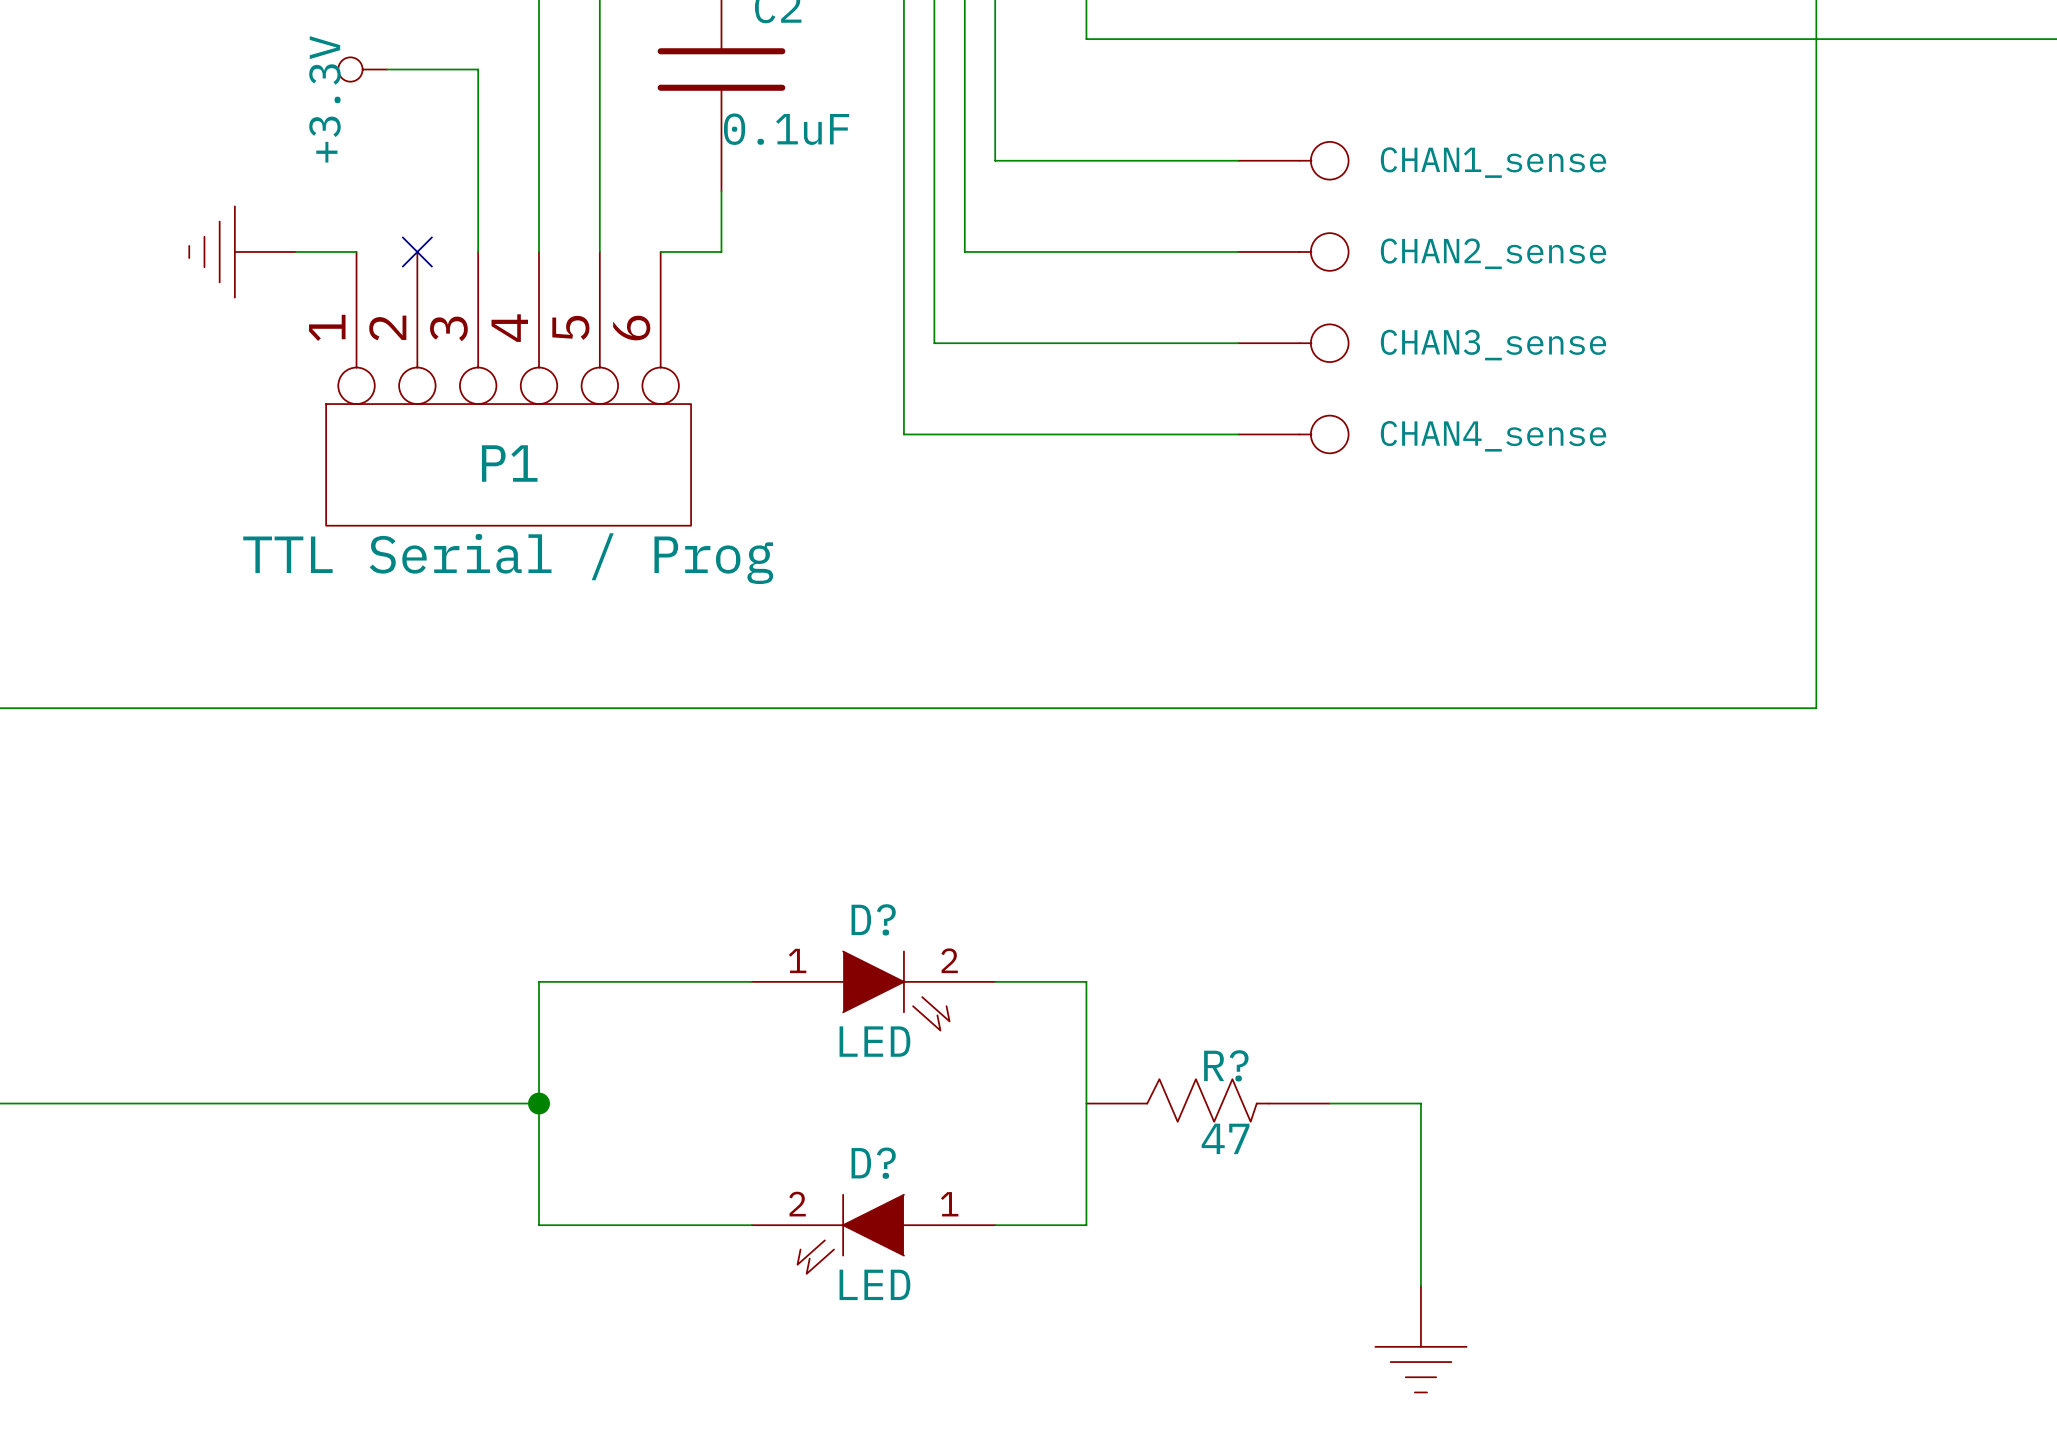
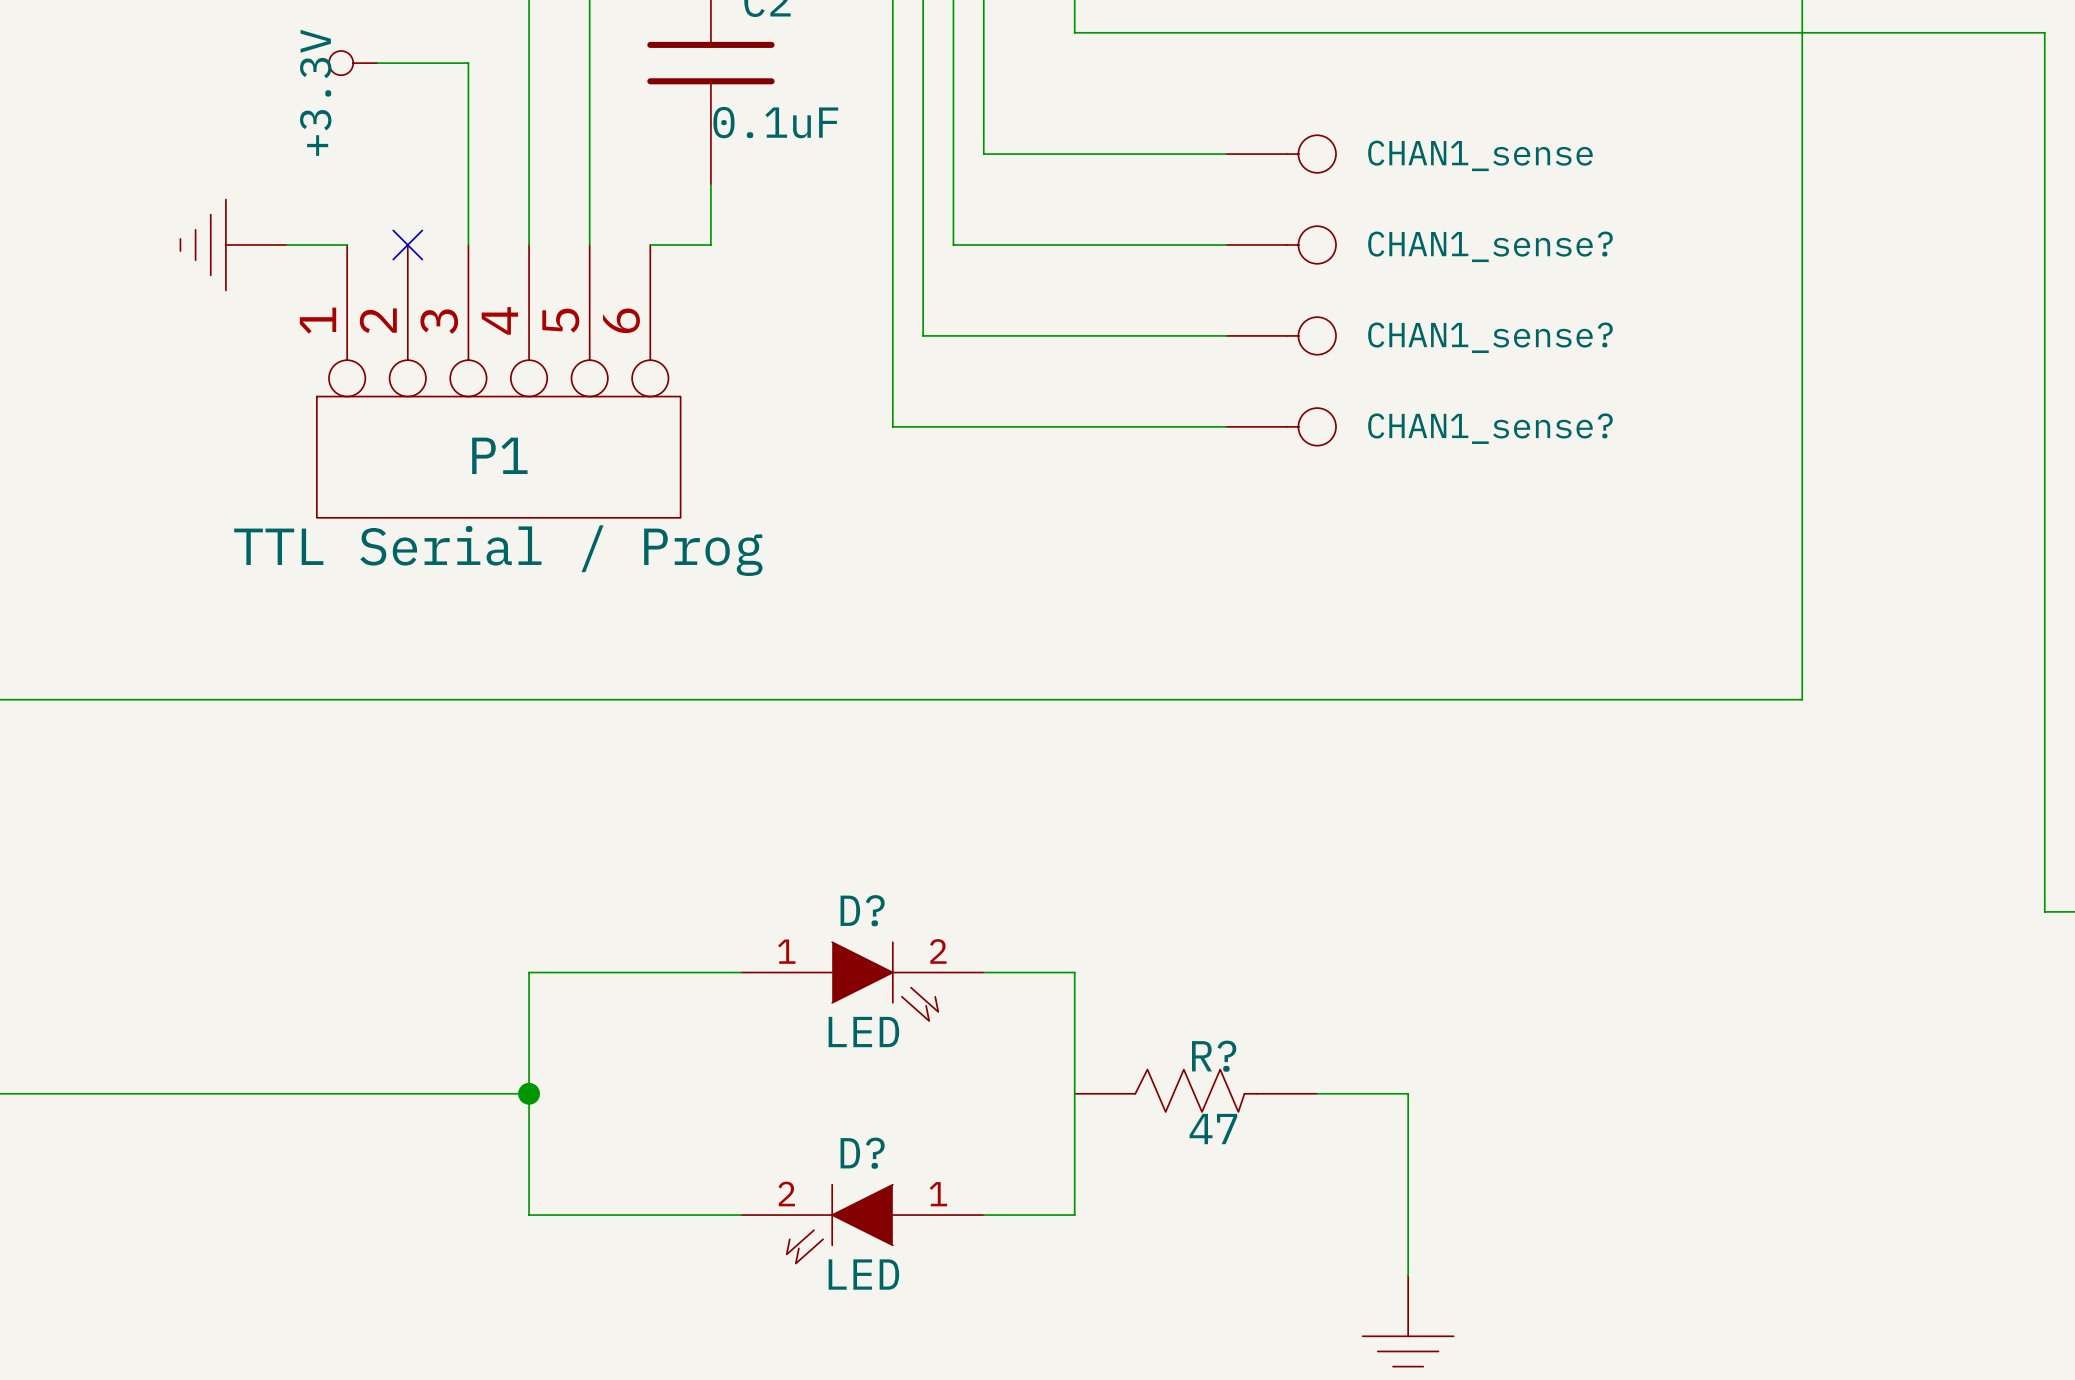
CHAN2_sense name: CHAN2_sense (1493, 253) -> CHAN1_sense? (1490, 246)
CHAN3_sense name: CHAN3_sense (1493, 345) -> CHAN1_sense? (1490, 337)
CHAN4_sense name: CHAN4_sense (1493, 436) -> CHAN1_sense? (1490, 428)

